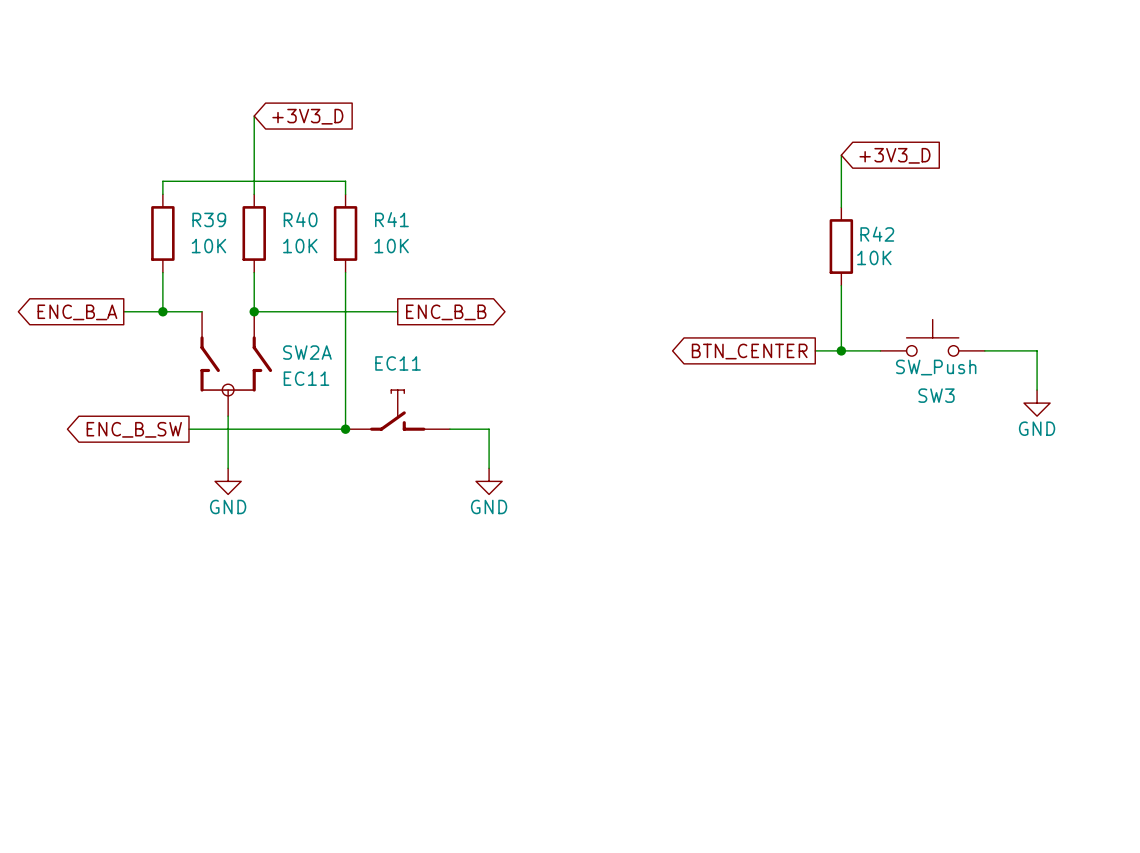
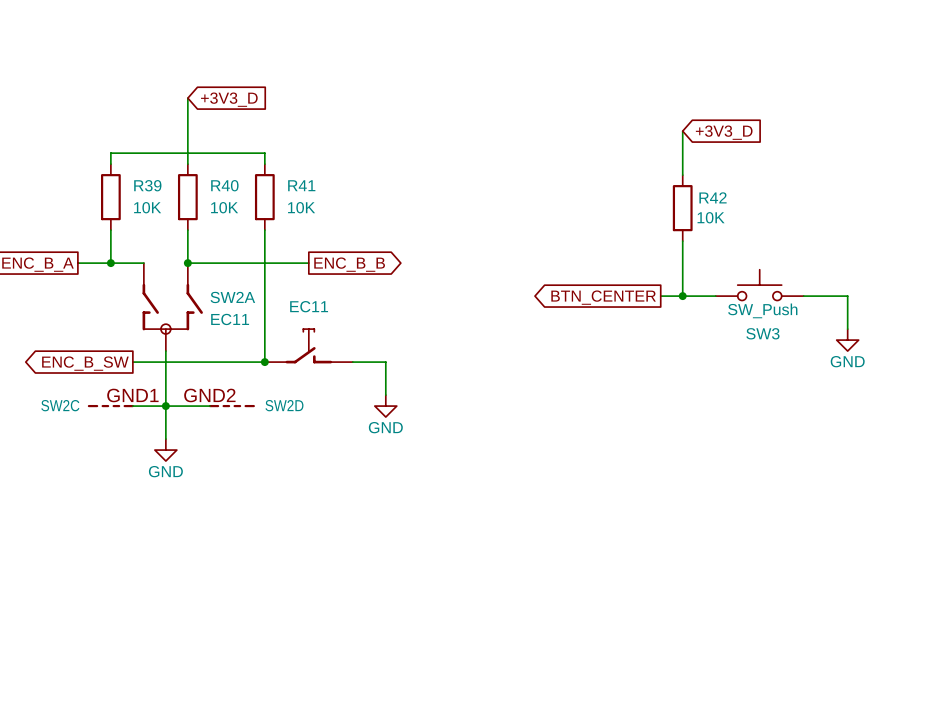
wire: none -> (165, 395) (165, 439)
SW2C: none -> (110, 406)
wire: none -> (132, 406) (209, 406)
power symbol position: GND (228, 481) -> GND (165, 450)
junction: none -> (165, 406)
SW2D: none -> (231, 406)

